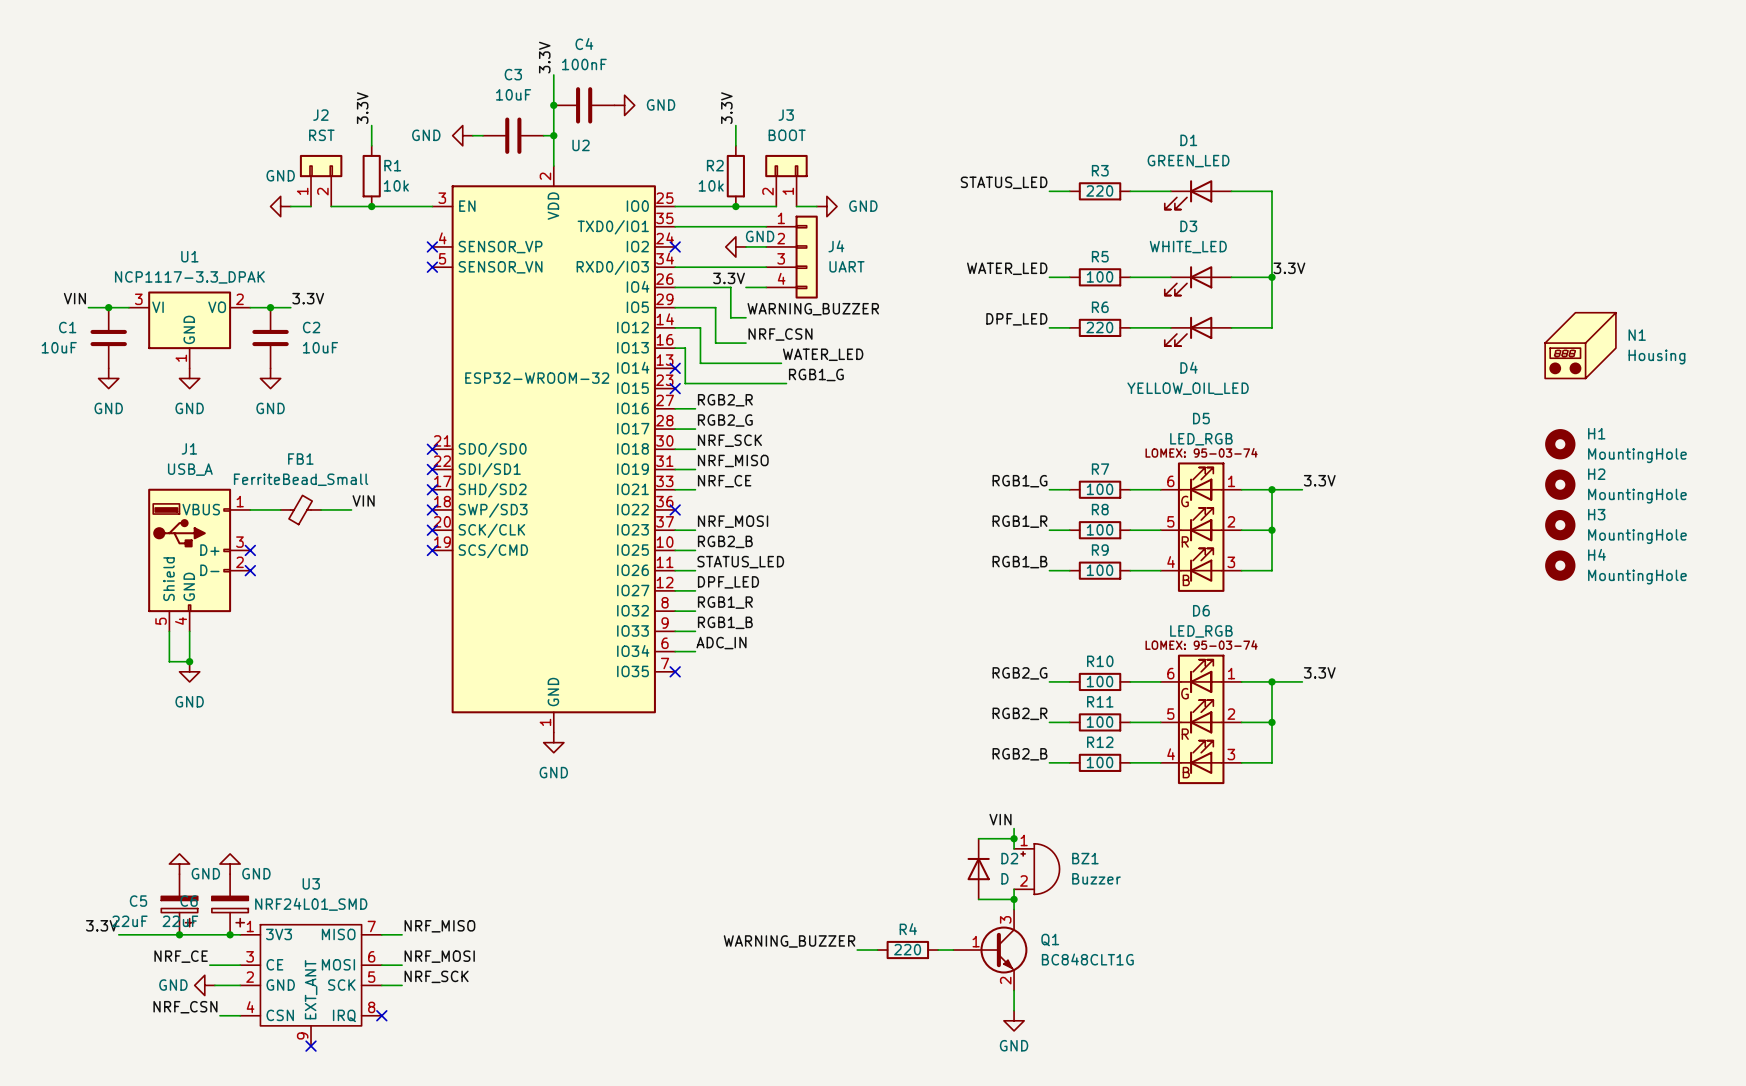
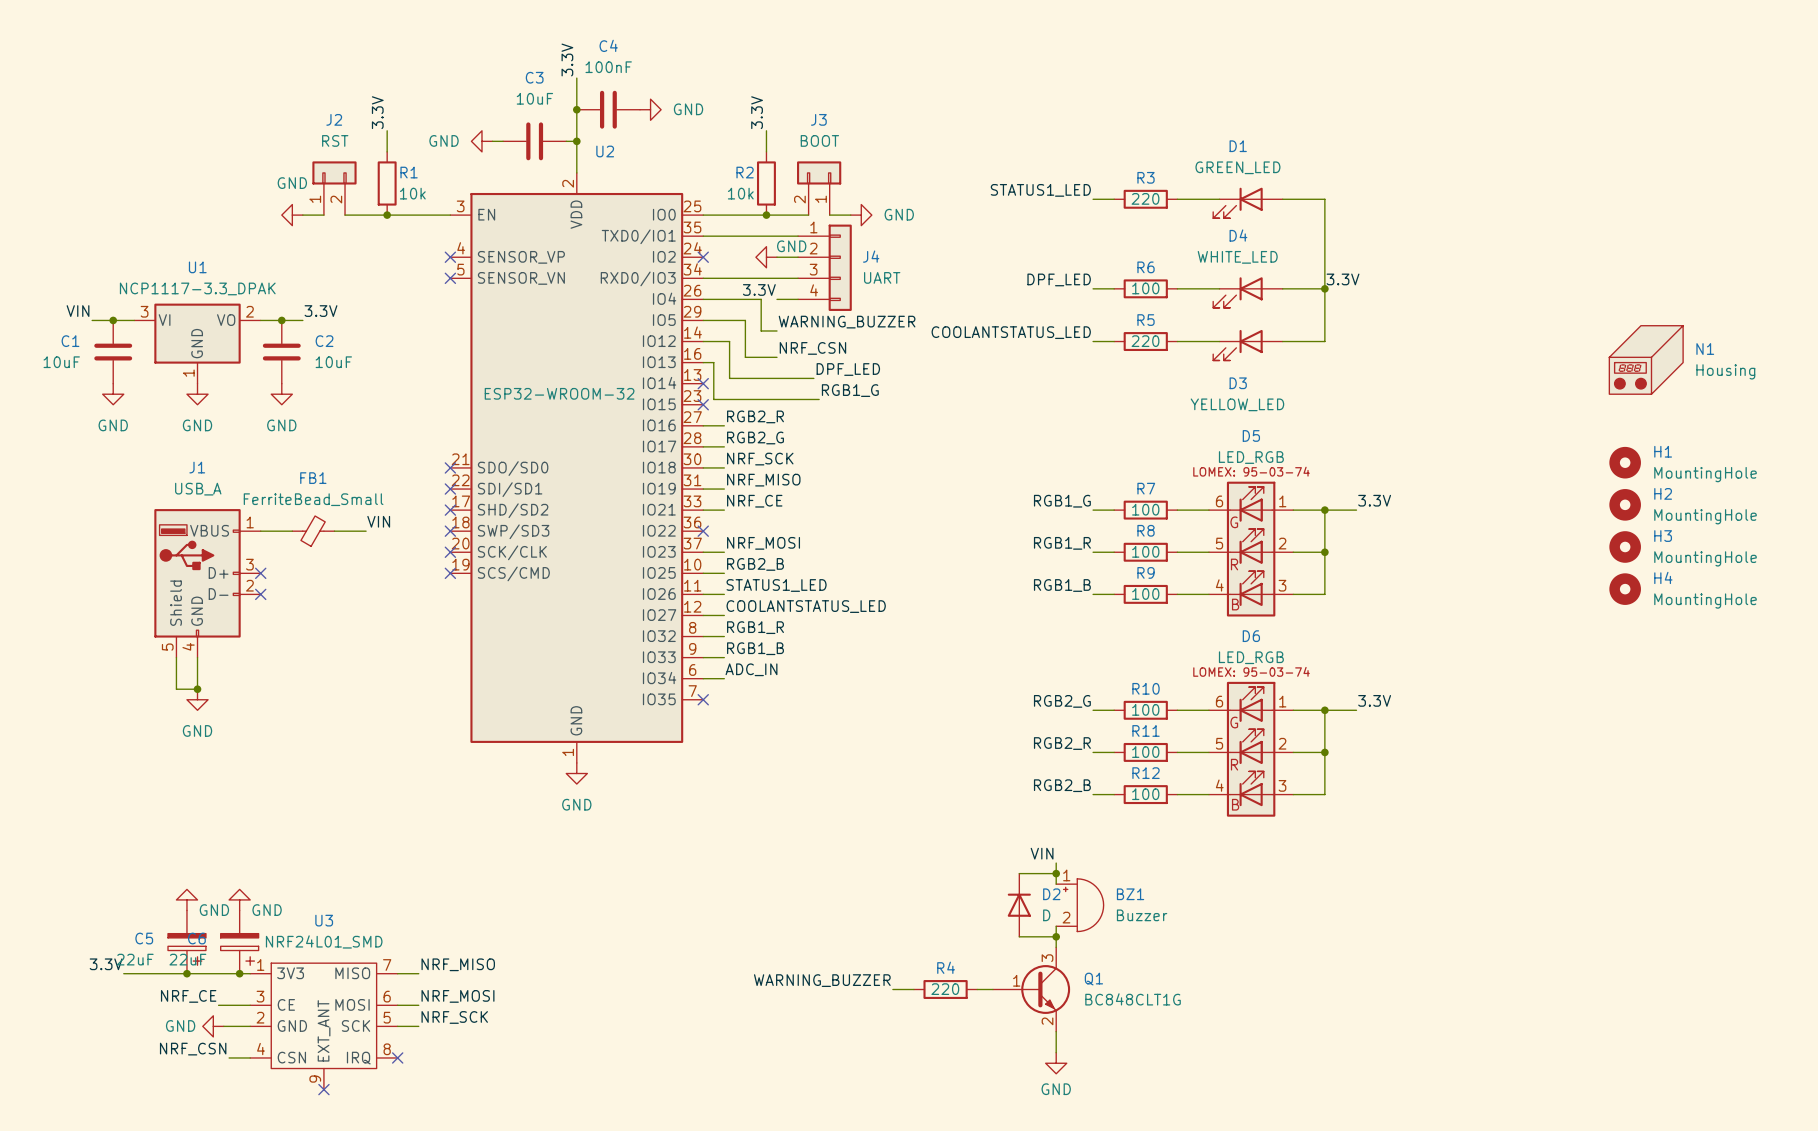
label: STATUS_LED (1004, 182) -> STATUS1_LED (1040, 190)
D3 name: D3 (1188, 226) -> D4 (1238, 235)
R5 name: R5 (1100, 256) -> R6 (1146, 267)
label: WATER_LED (1007, 268) -> DPF_LED (1059, 279)
R6 name: R6 (1100, 307) -> R5 (1146, 320)
label: DPF_LED (1016, 319) -> COOLANTSTATUS_LED (1011, 332)
label: WATER_LED (823, 354) -> DPF_LED (848, 369)
D4 name: D4 (1189, 367) -> D3 (1238, 383)
D4 value: YELLOW_OIL_LED (1188, 388) -> YELLOW_LED (1237, 404)
label: STATUS_LED (740, 562) -> STATUS1_LED (776, 585)
label: DPF_LED (728, 582) -> COOLANTSTATUS_LED (806, 606)

